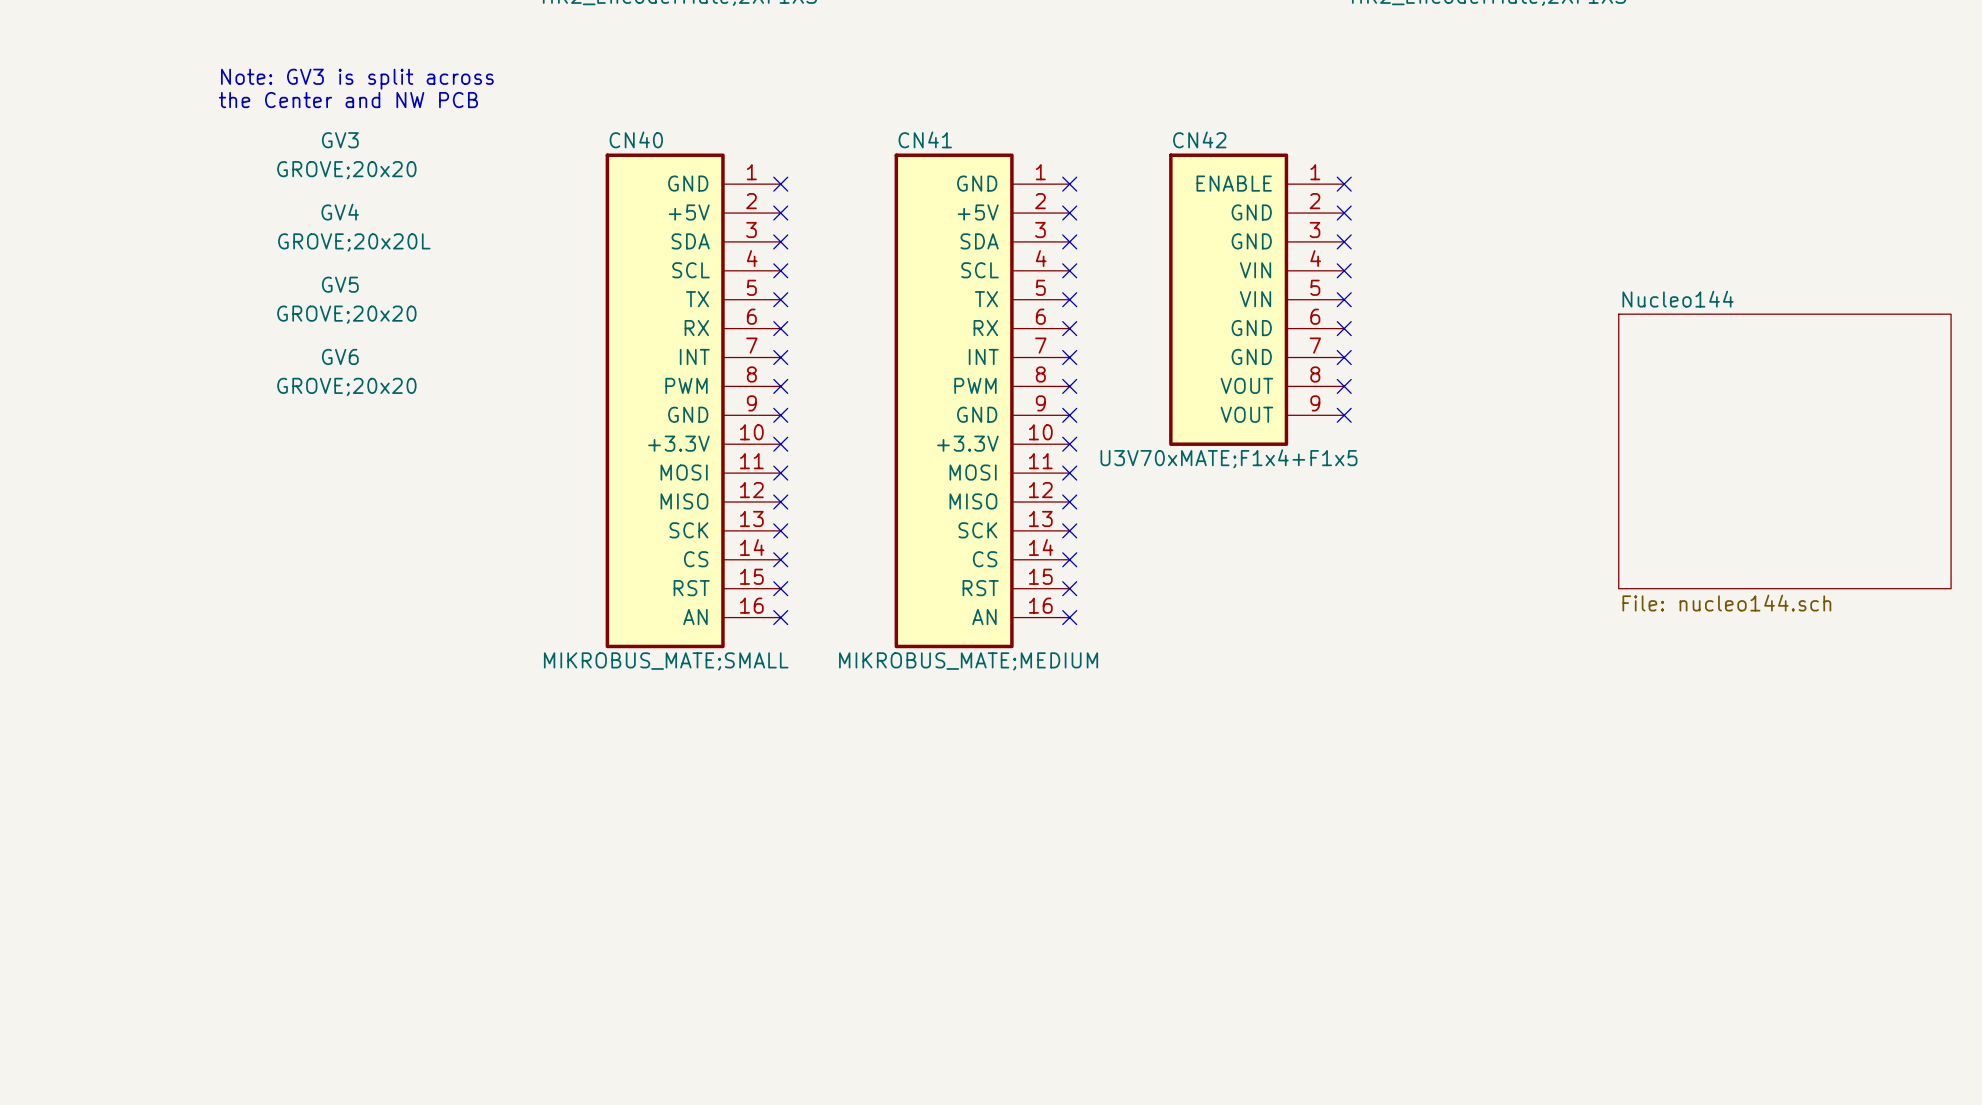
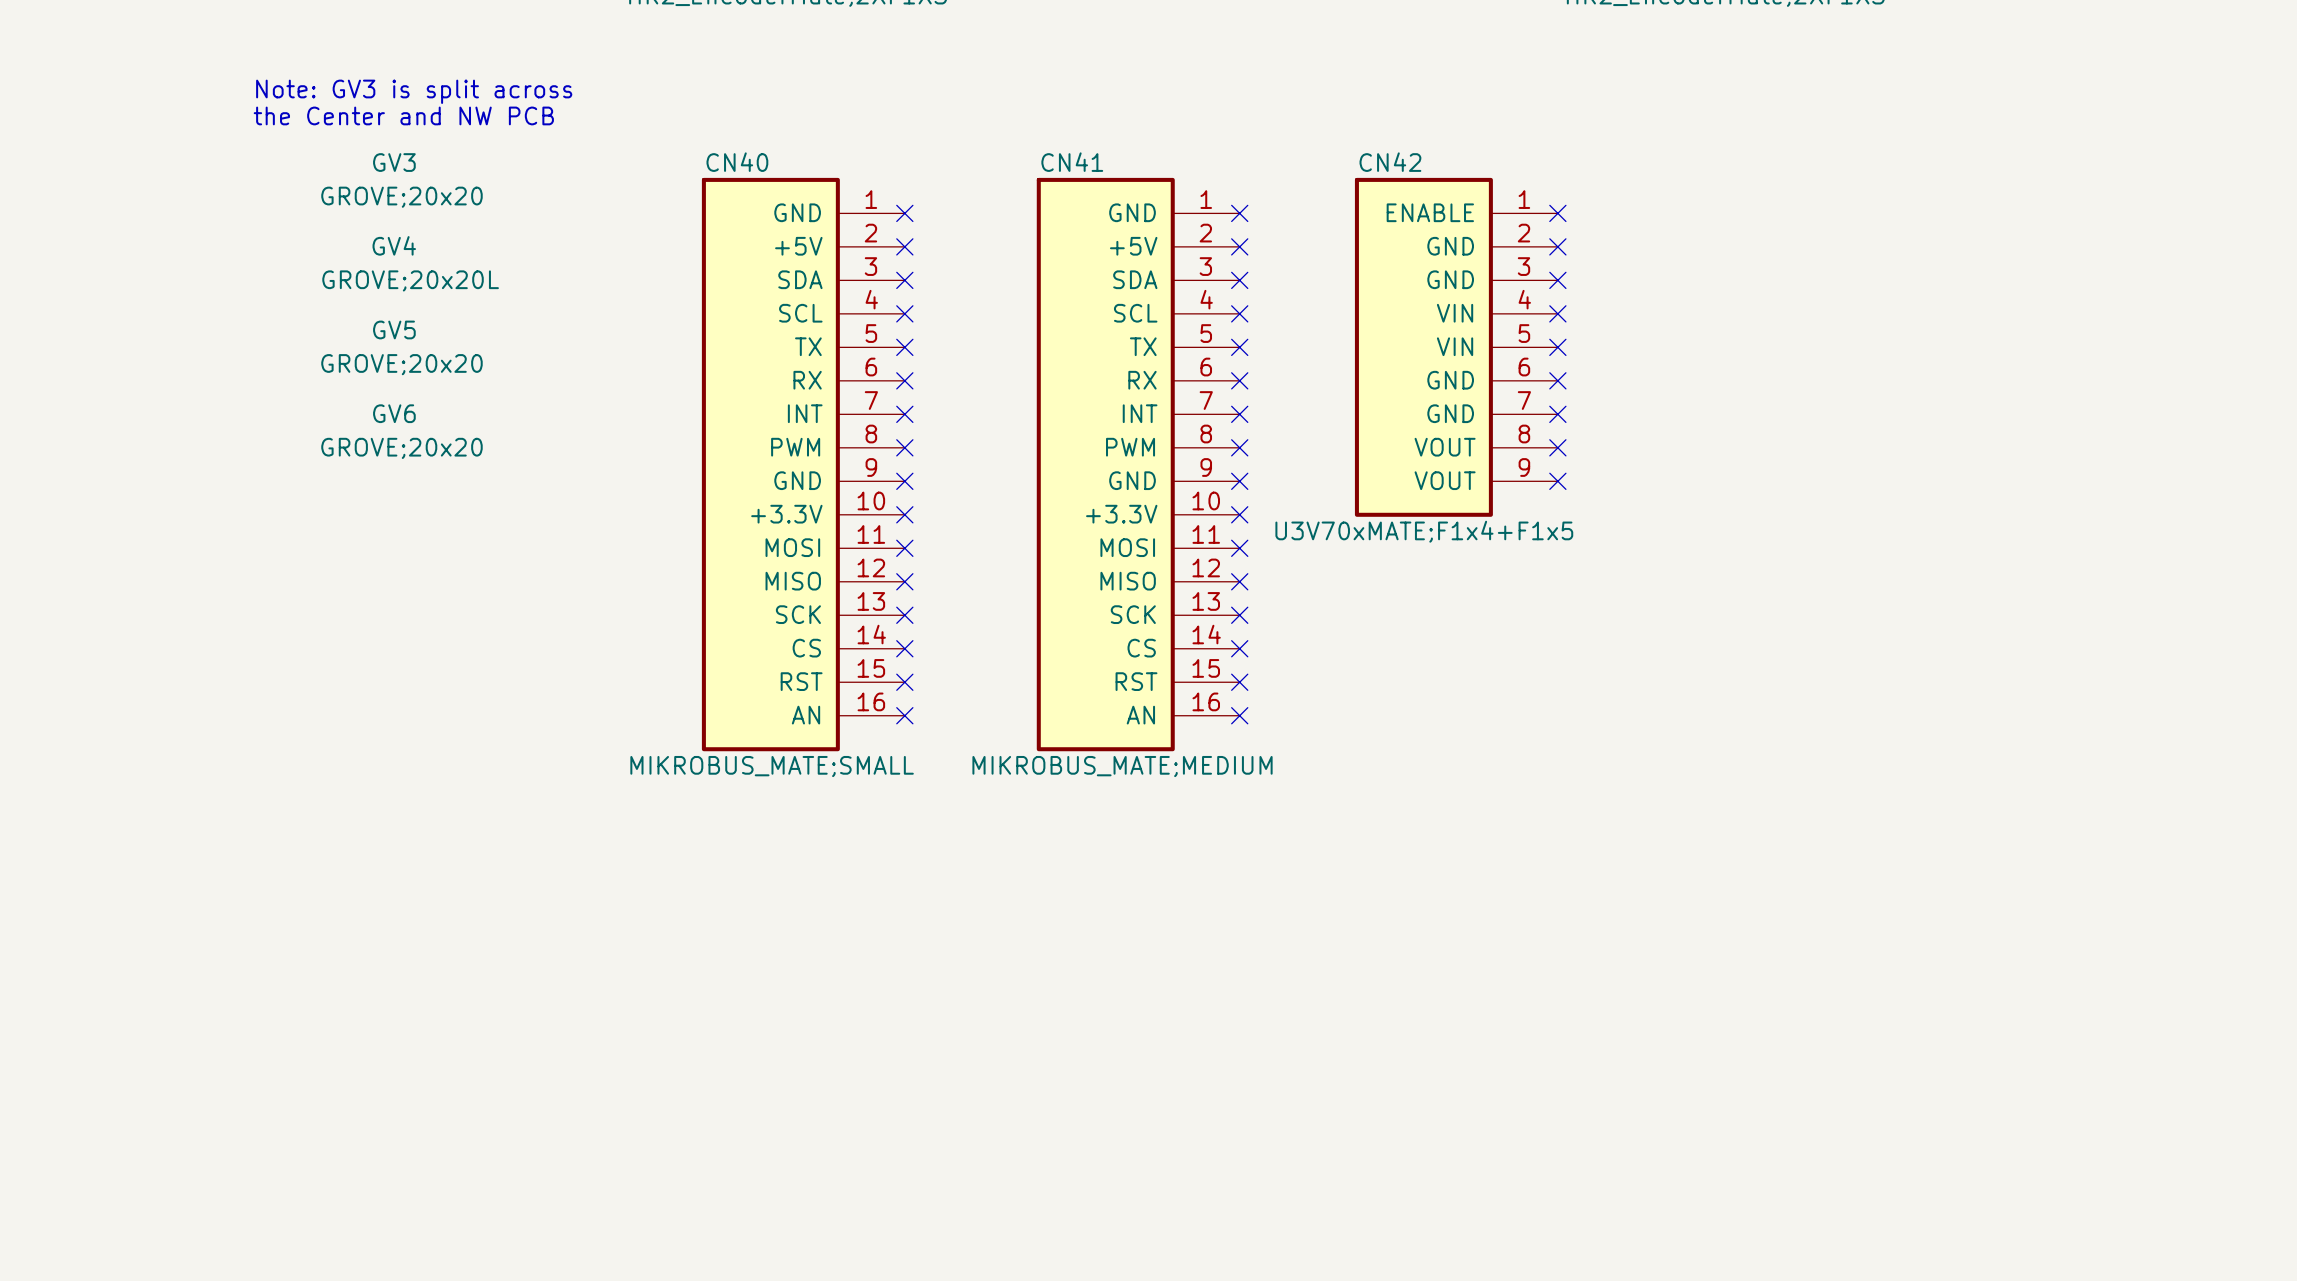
sheet Nucleo144: File: nucleo144.sch (1784, 451) -> none

